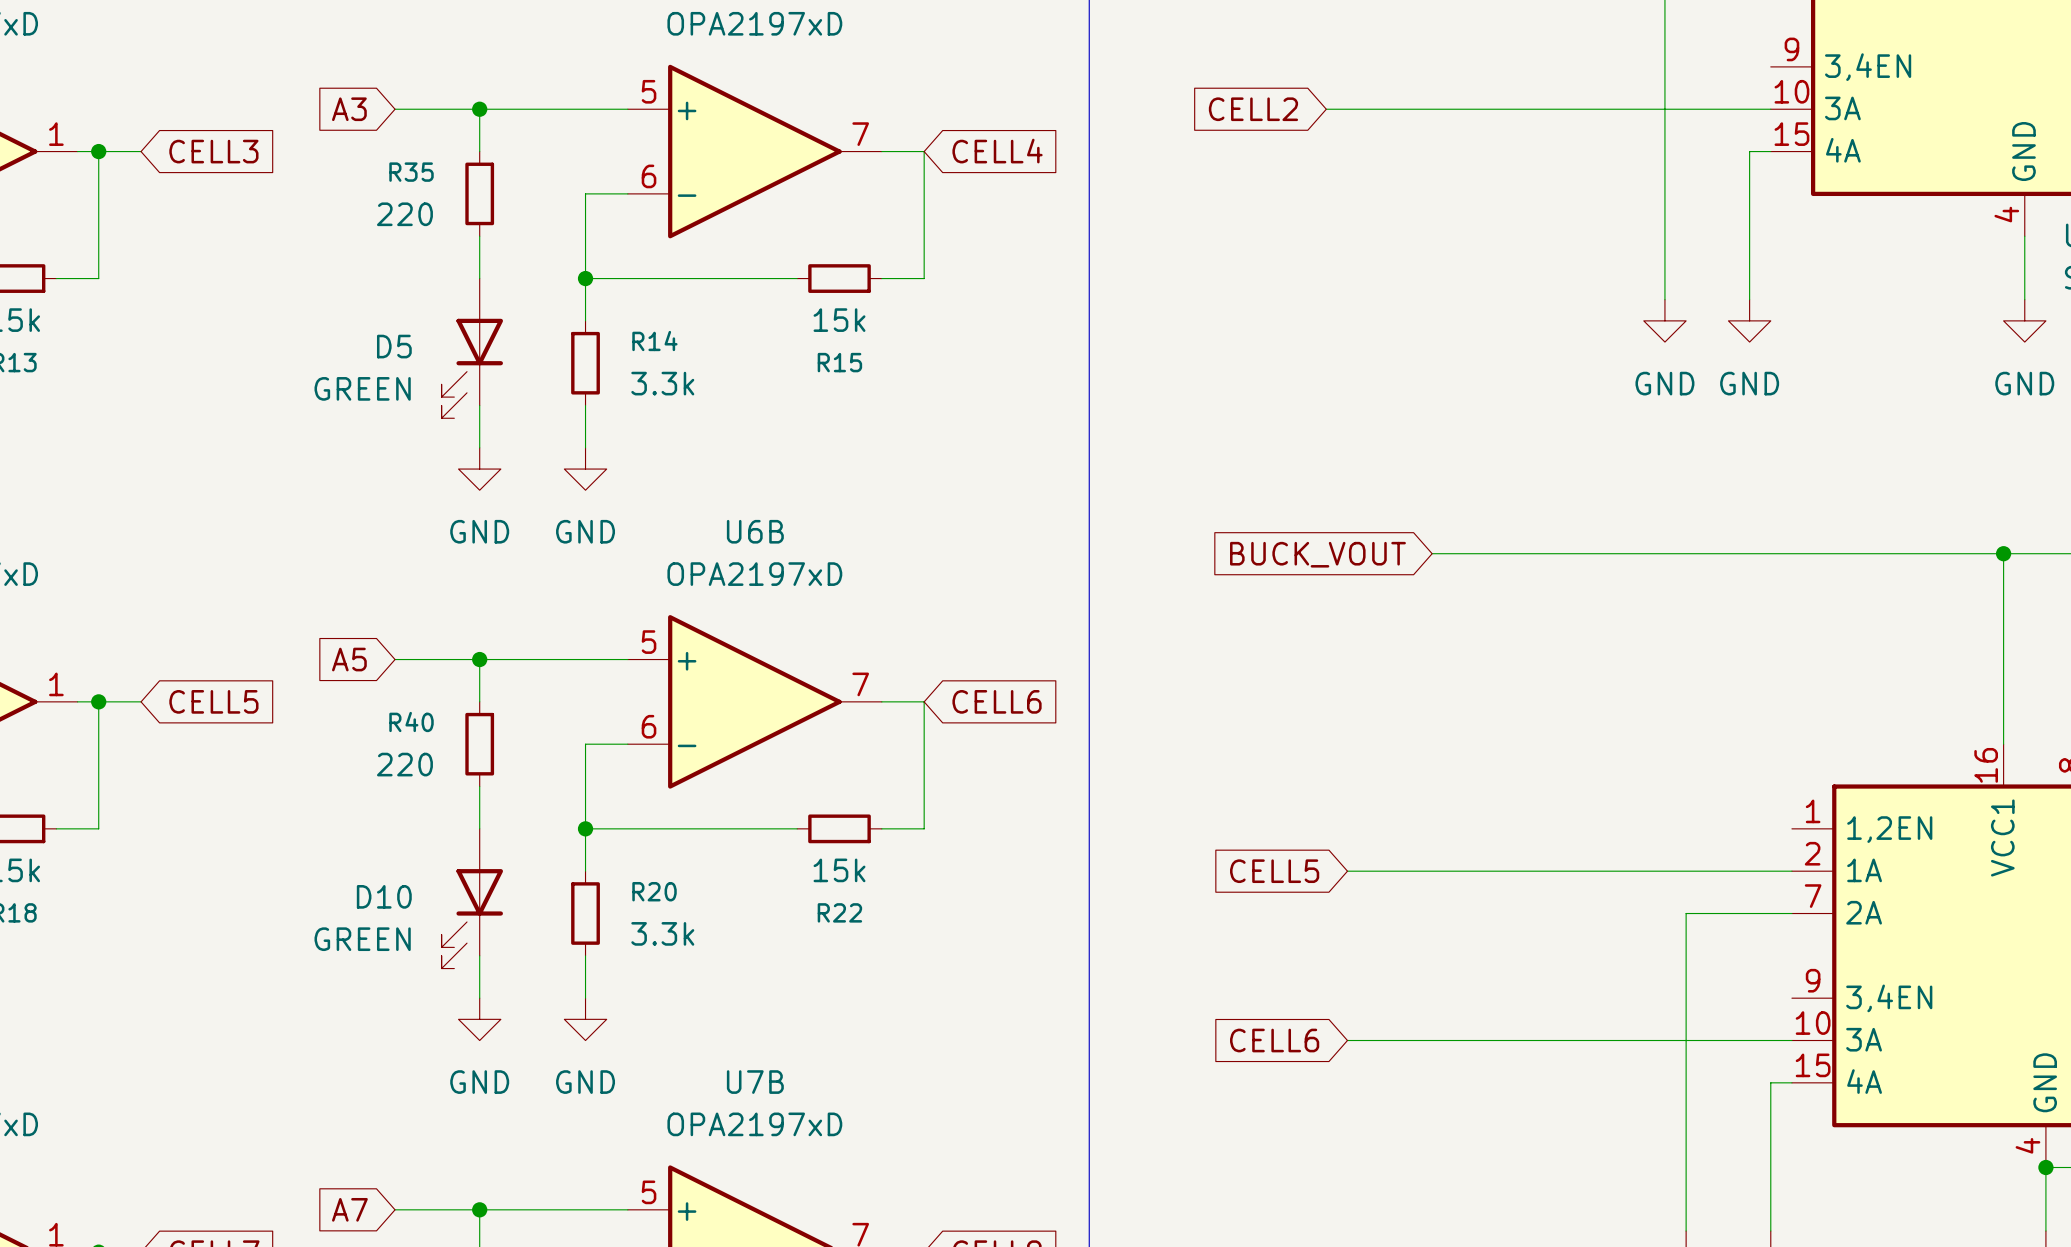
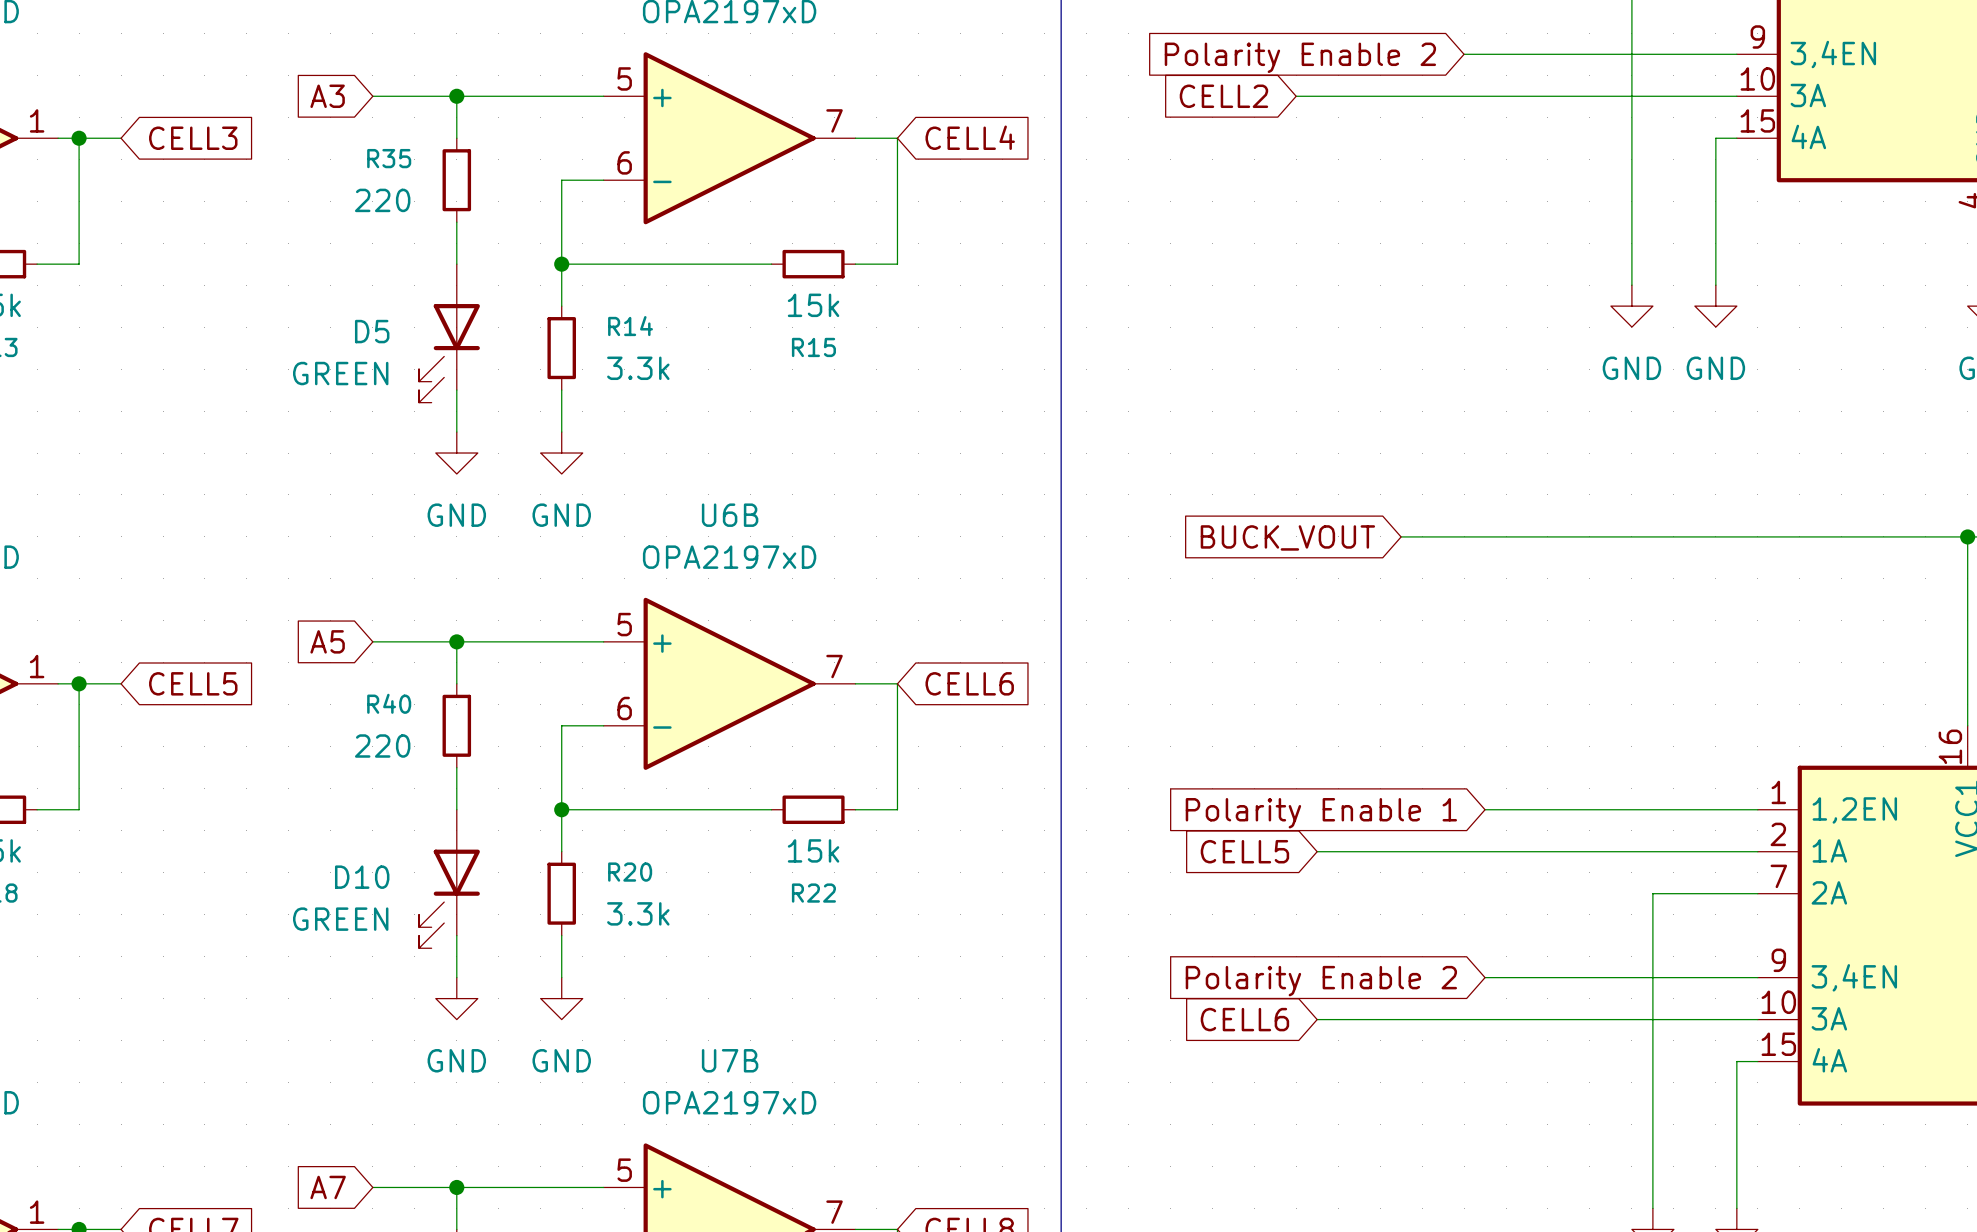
wire: none -> (1464, 54) (1736, 54)
global label: none -> Polarity Enable 2 (1300, 57)
wire: none -> (1485, 809) (1757, 809)
global label: none -> Polarity Enable 1 (1321, 813)
wire: none -> (1485, 977) (1757, 977)
global label: none -> Polarity Enable 2 (1321, 981)

